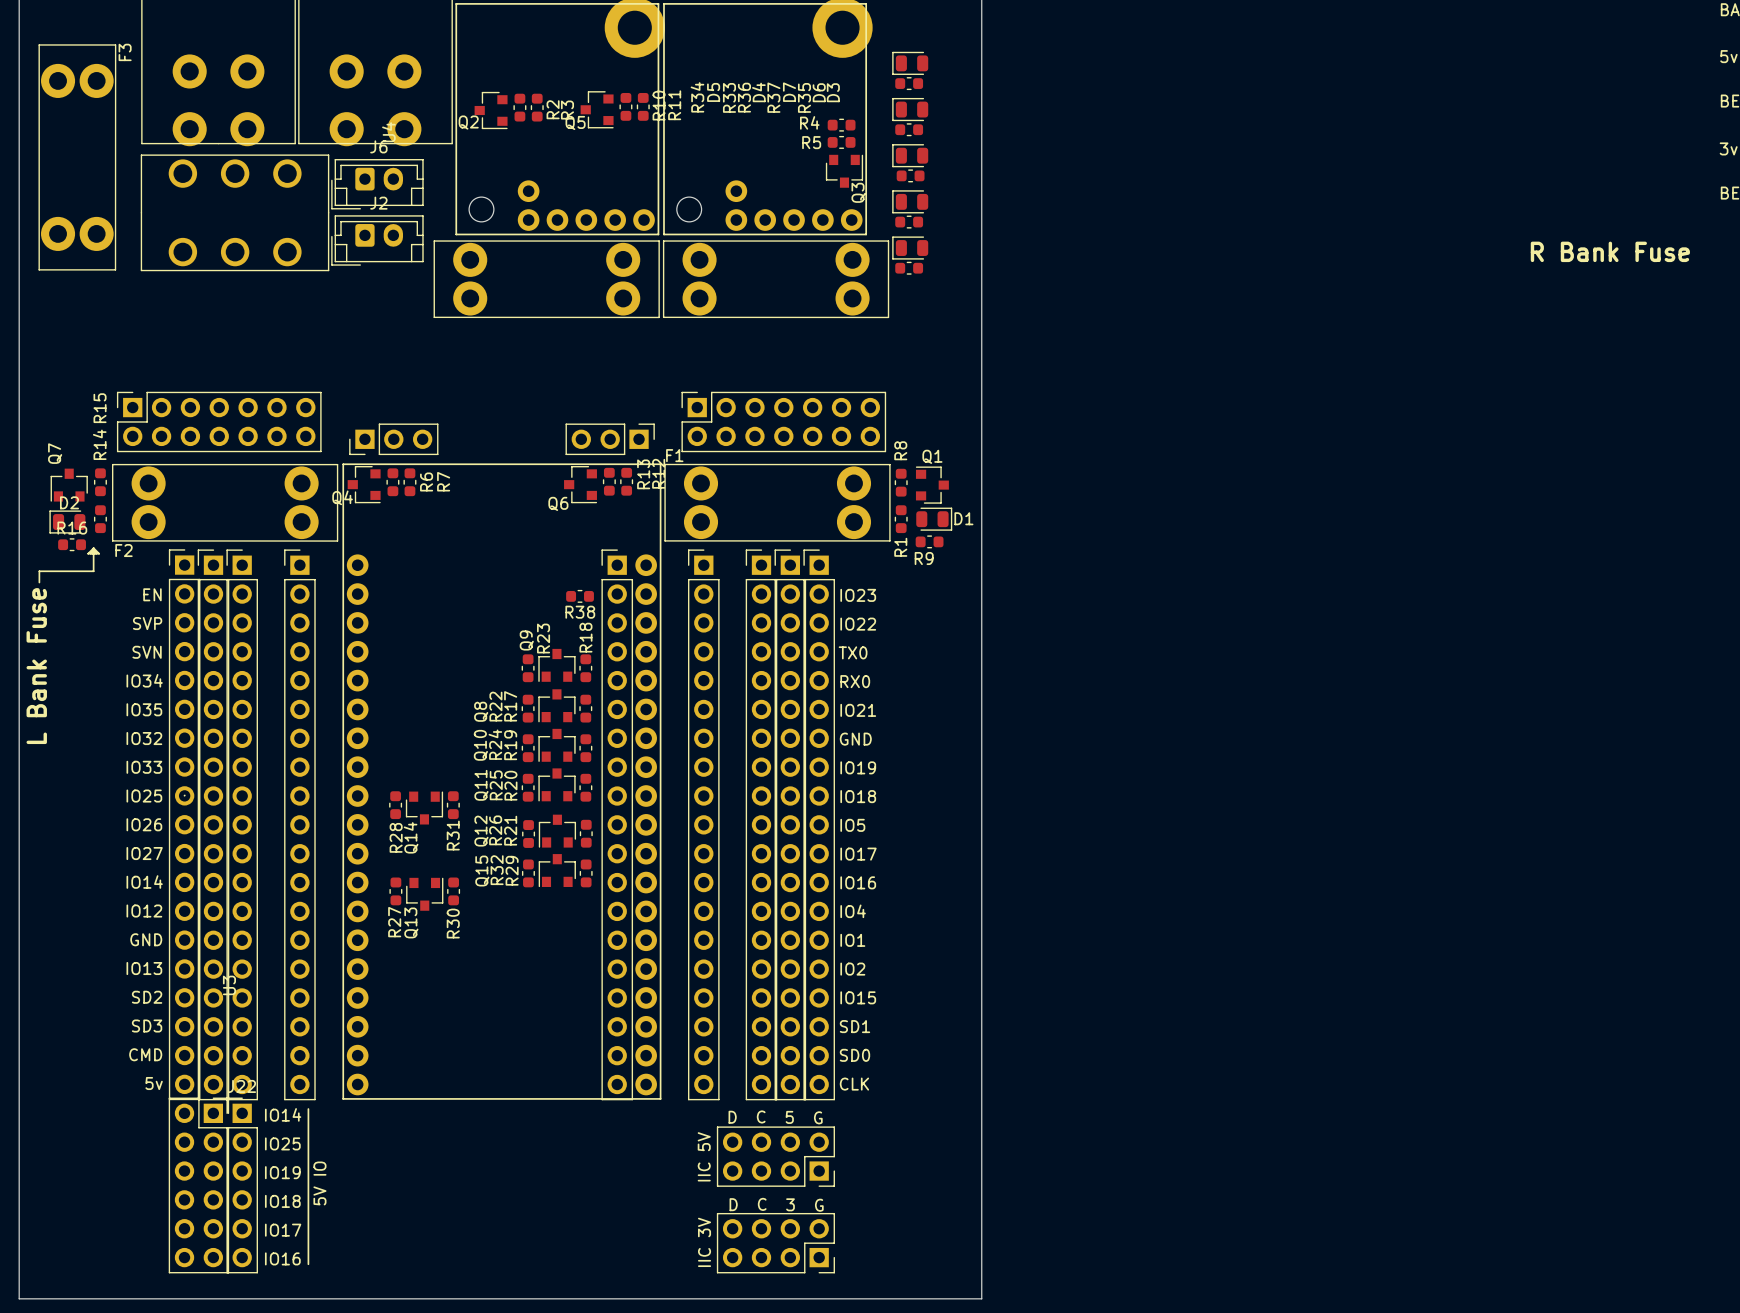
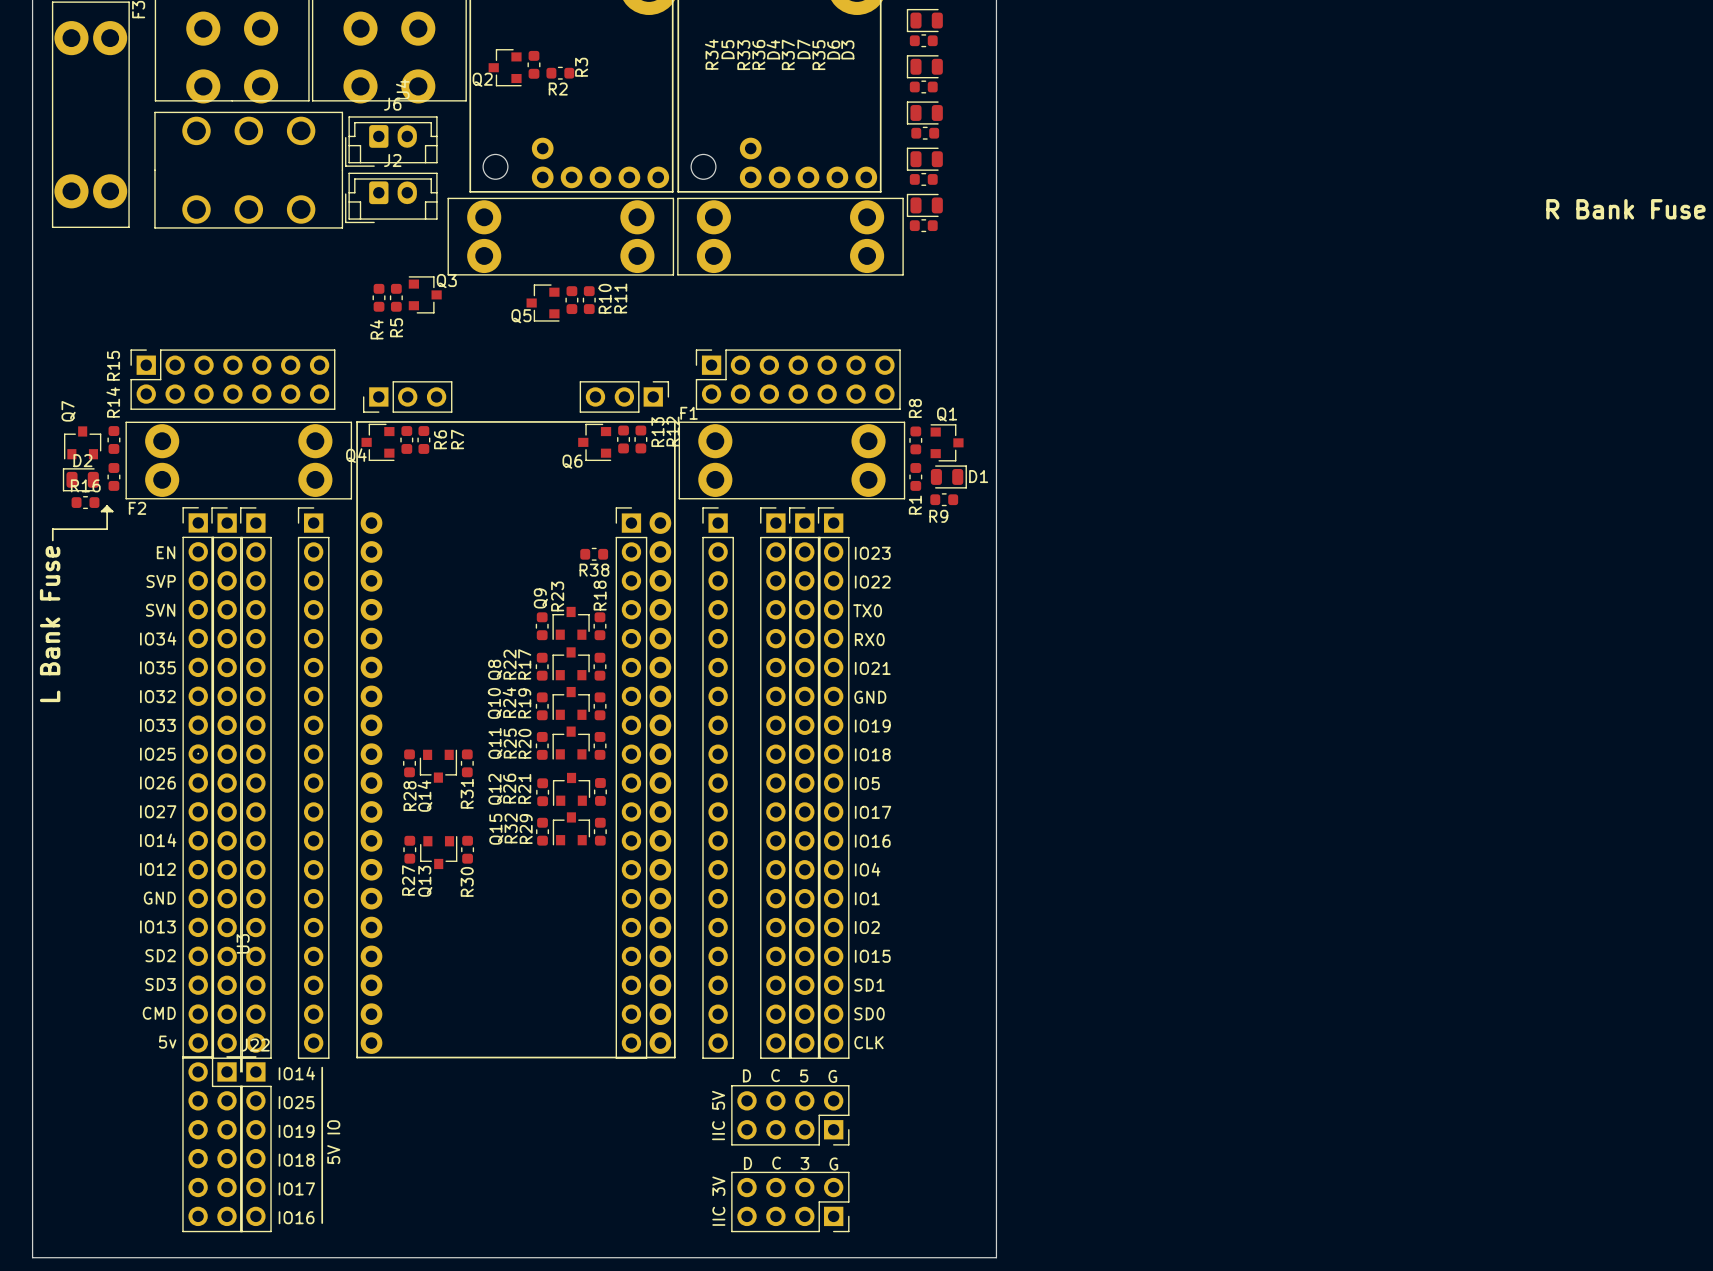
R11 position: (625, 106) -> (571, 300)
R10 position: (643, 106) -> (589, 300)
R2 rotation: 0° (537, 107) -> 90° clockwise (560, 73)
Q5 position: (597, 109) -> (543, 303)
R4 name position: R4 (809, 122) -> R4 (376, 329)
R4 rotation: 0° (841, 125) -> 90° clockwise (379, 297)
R4 position: (841, 125) -> (379, 297)
R5 name position: R5 (811, 142) -> R5 (396, 327)
R5 rotation: 0° (841, 142) -> 90° clockwise (396, 297)
R5 position: (841, 142) -> (396, 297)
Q3 rotation: 0° (844, 171) -> 90° counterclockwise (425, 294)
Q3 position: (844, 171) -> (425, 294)

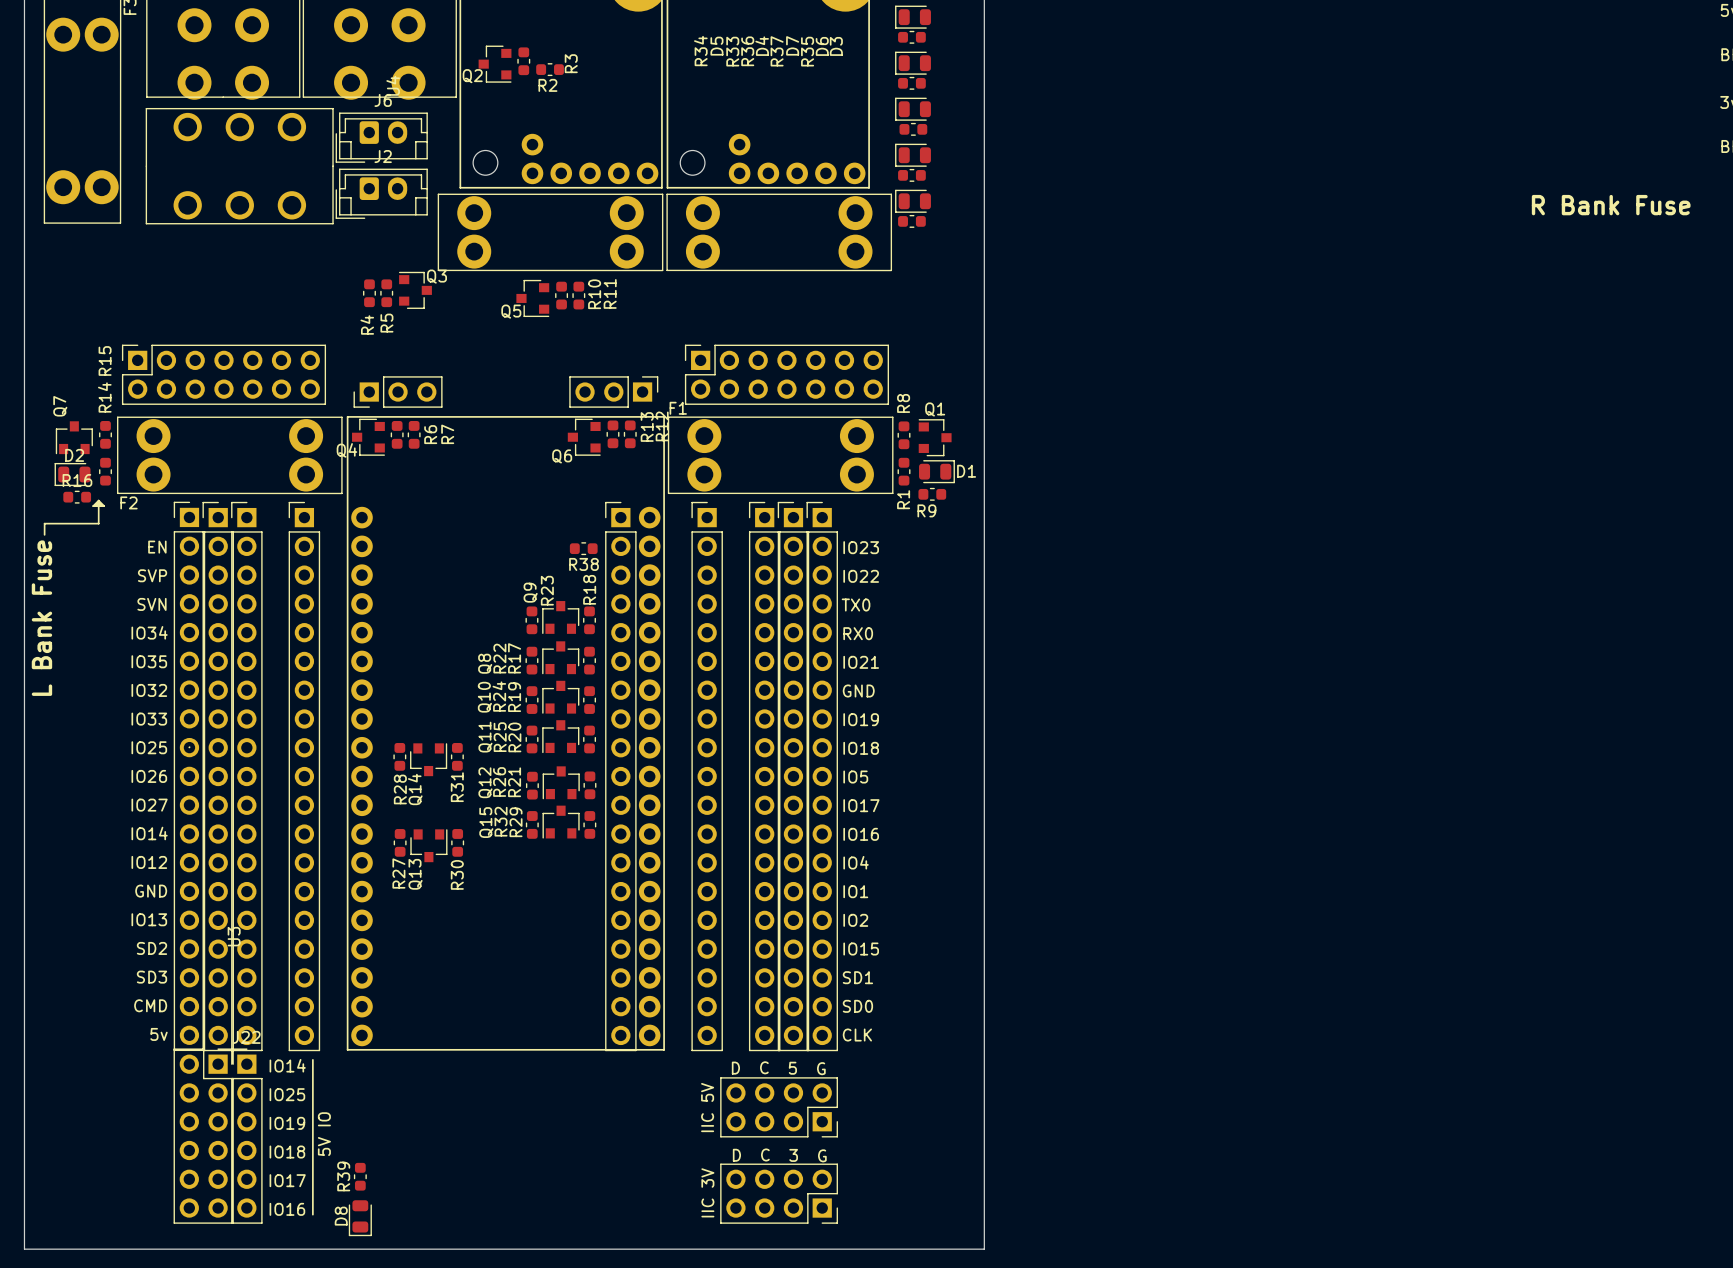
R39: none -> (360, 1176)
D8: none -> (360, 1218)

